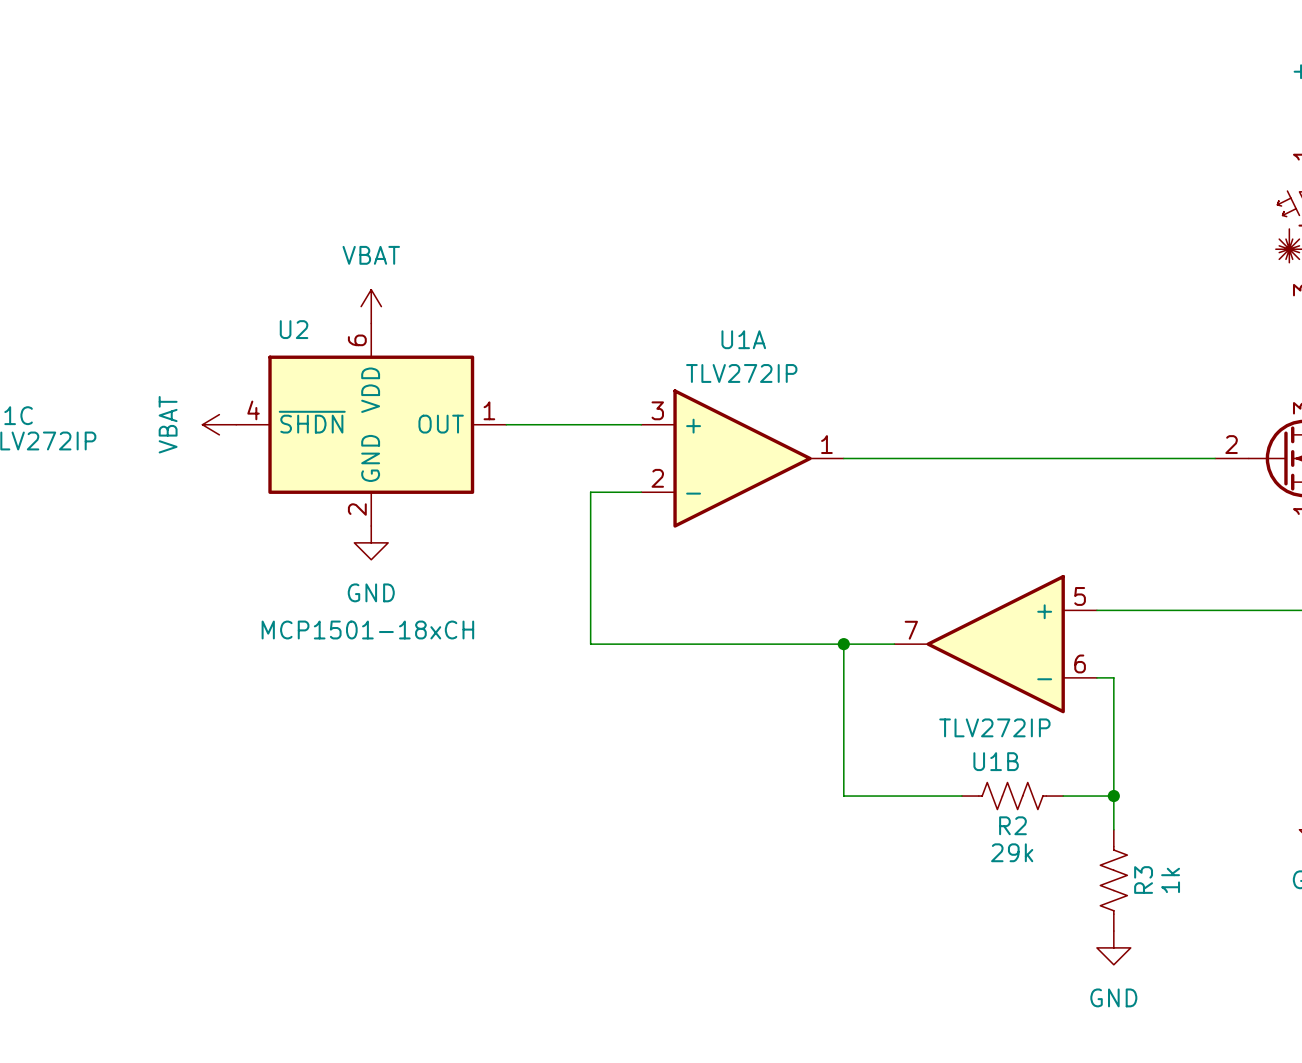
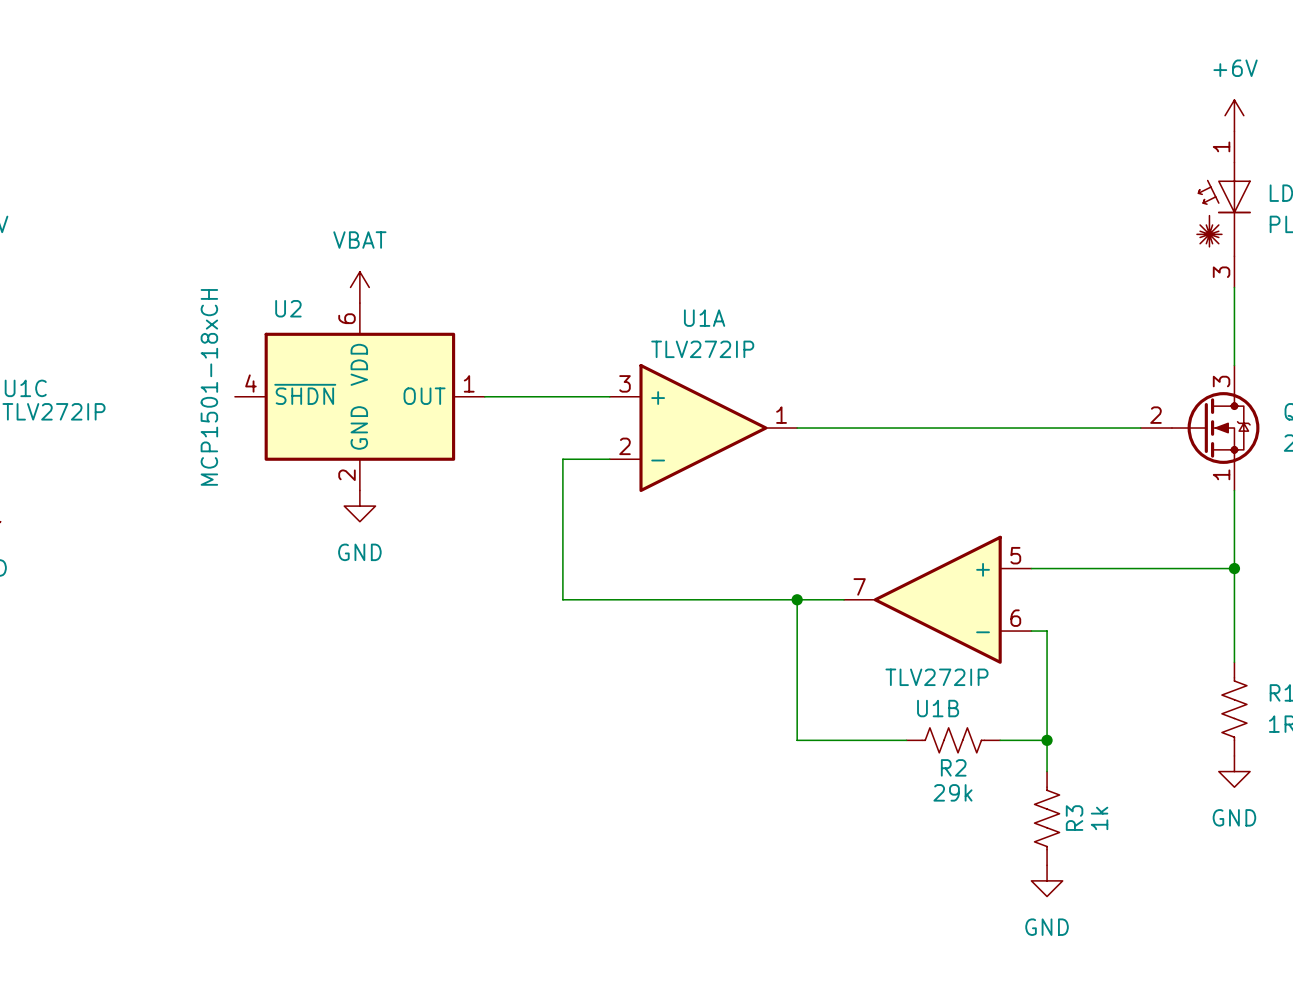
power symbol: VBAT (219, 424) -> none
U2 value rotation: 0° (367, 630) -> 90° counterclockwise (209, 387)
U2 value position: MCP1501-18xCH (367, 630) -> MCP1501-18xCH (209, 387)

